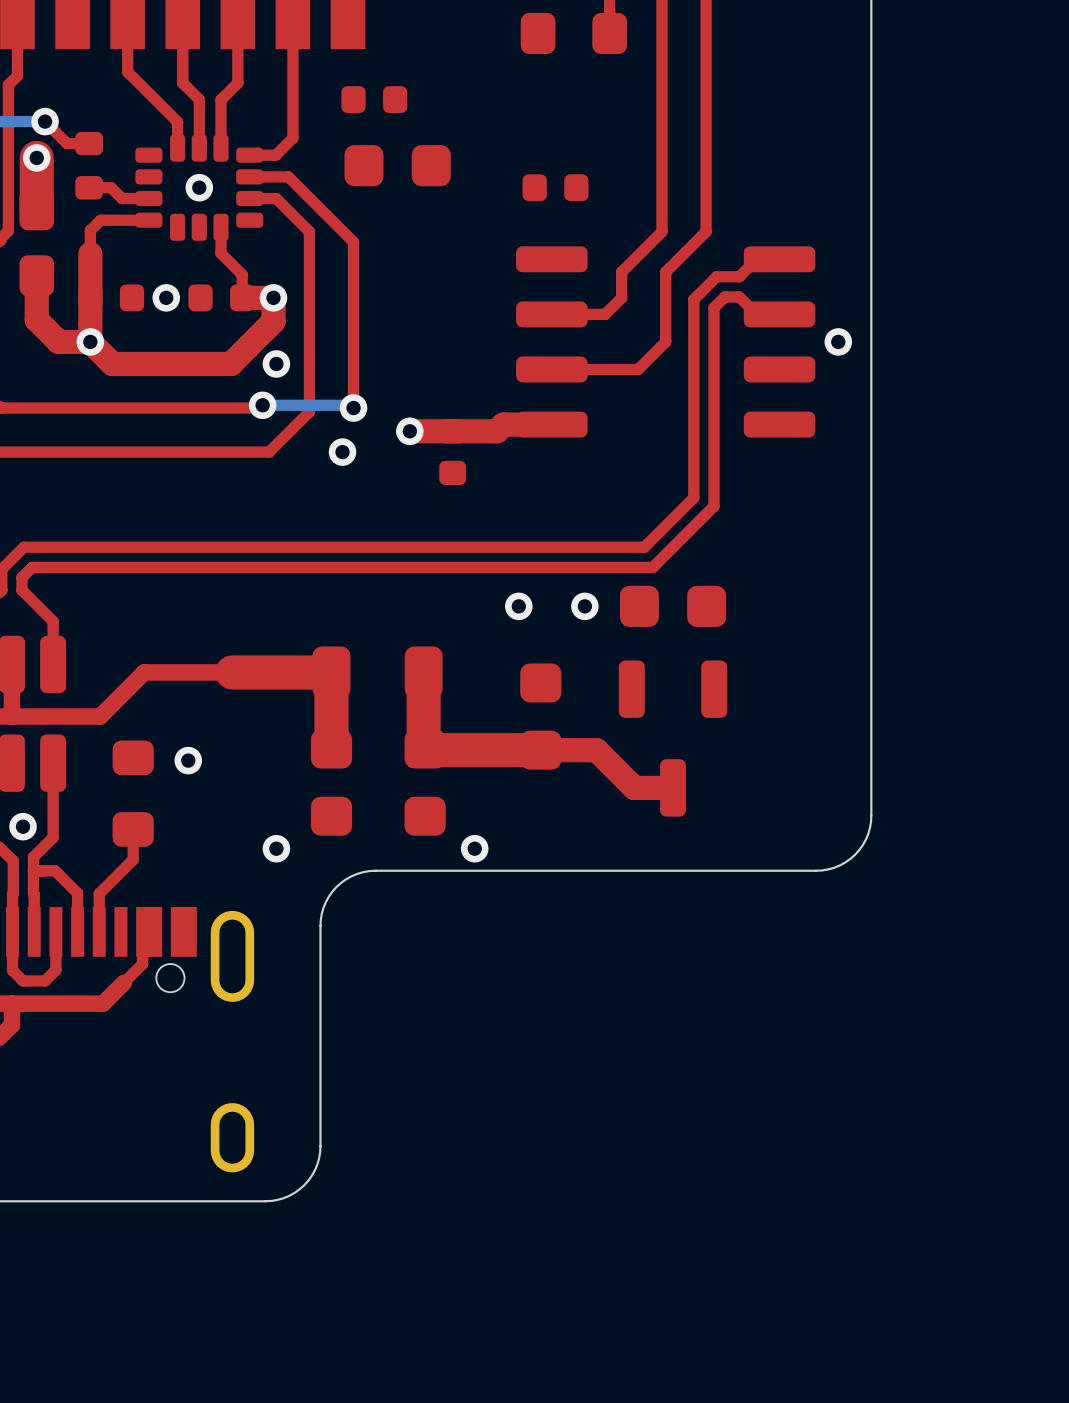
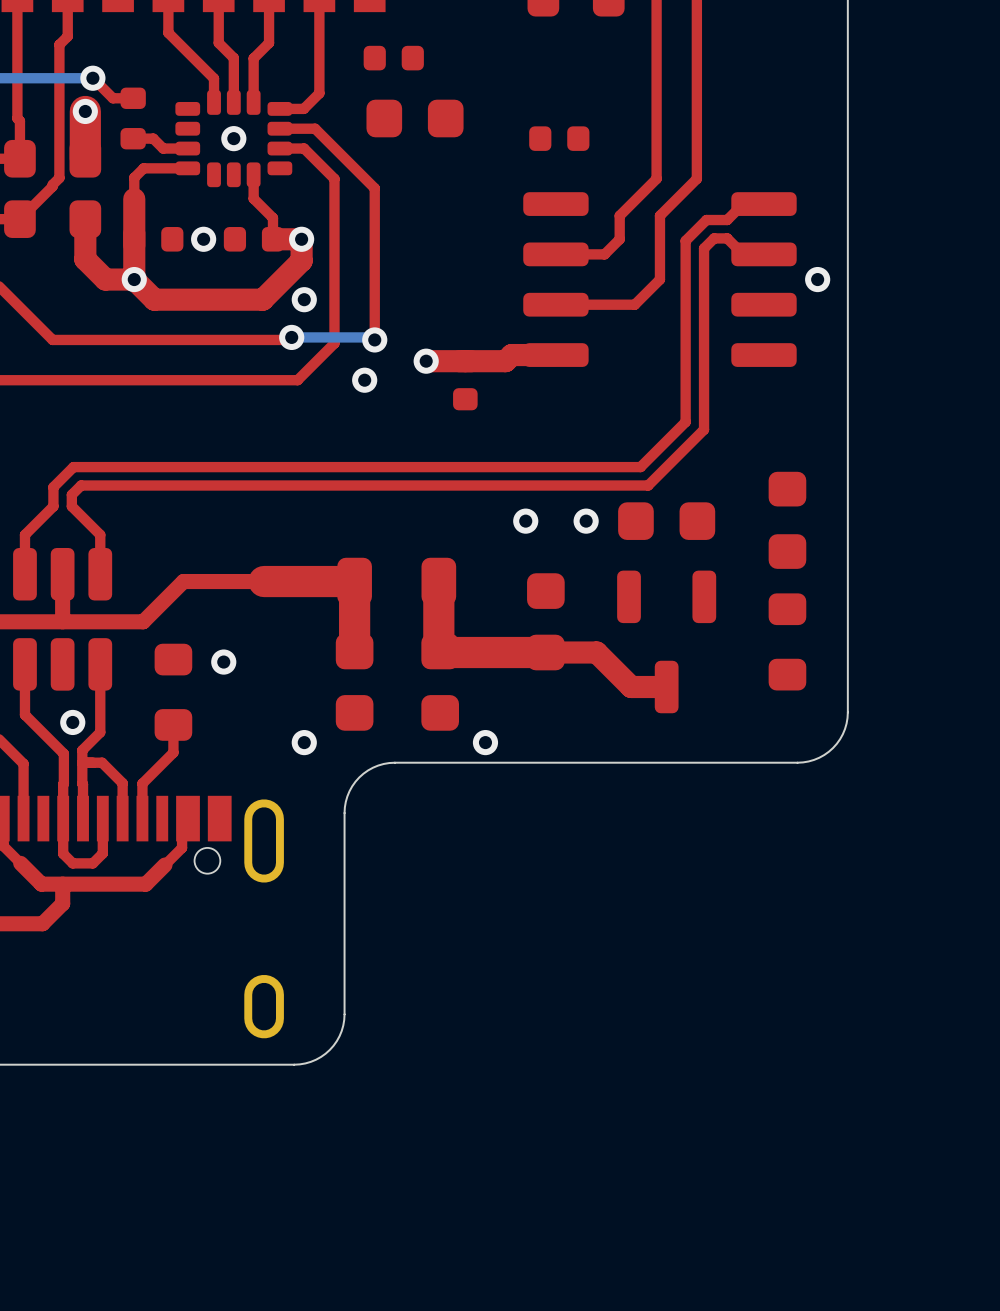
part: none -> (787, 520)
part: none -> (787, 641)

